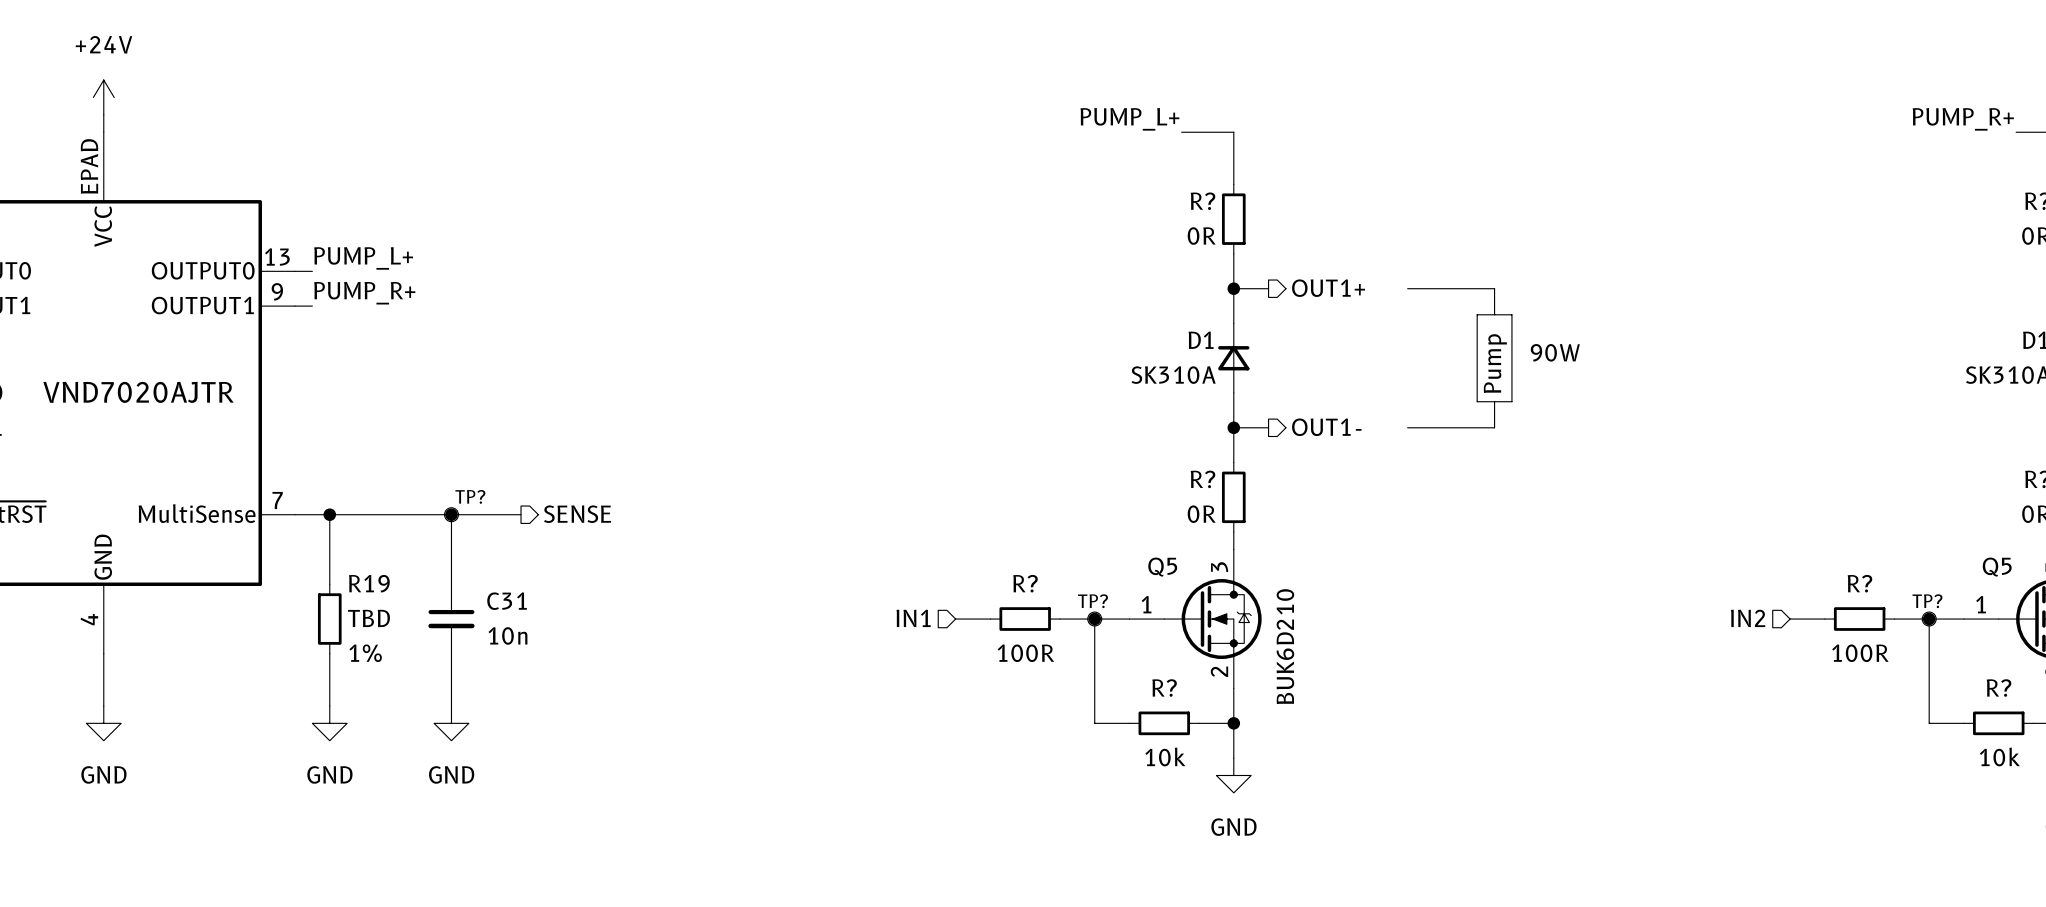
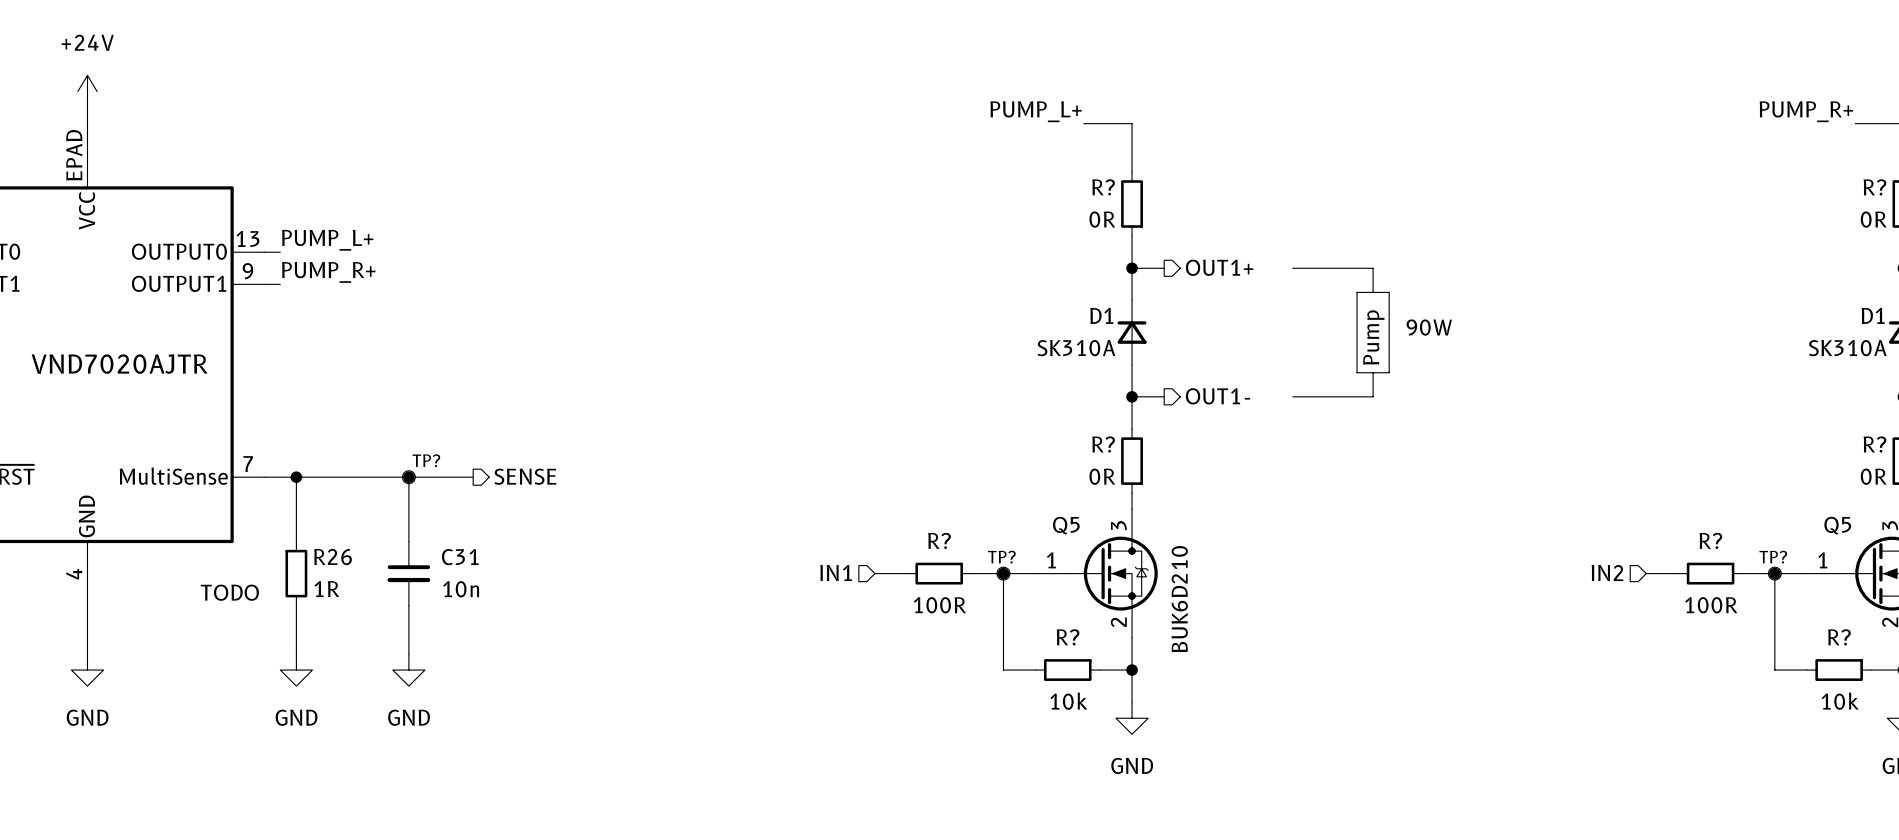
R19 name: R19 (369, 583) -> R26 (332, 557)
R19 value: TBD (369, 618) -> 1R (326, 589)
text: none -> TODO (229, 592)
R19 text: 1% (365, 653) -> none

